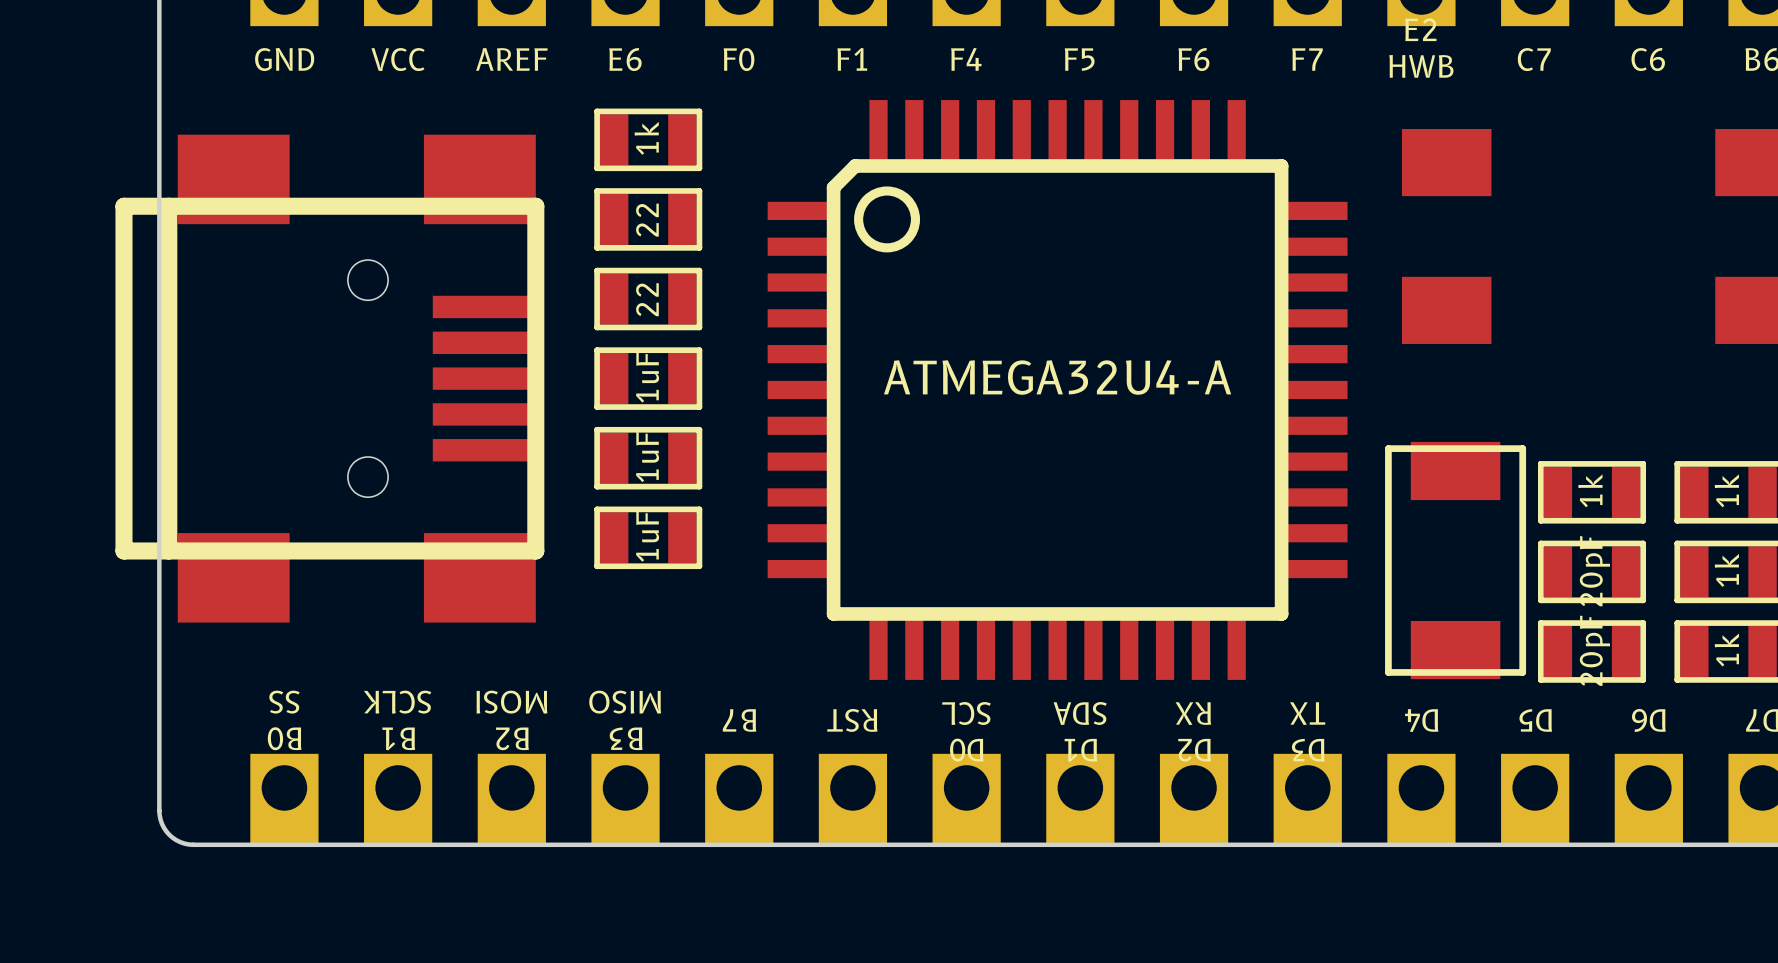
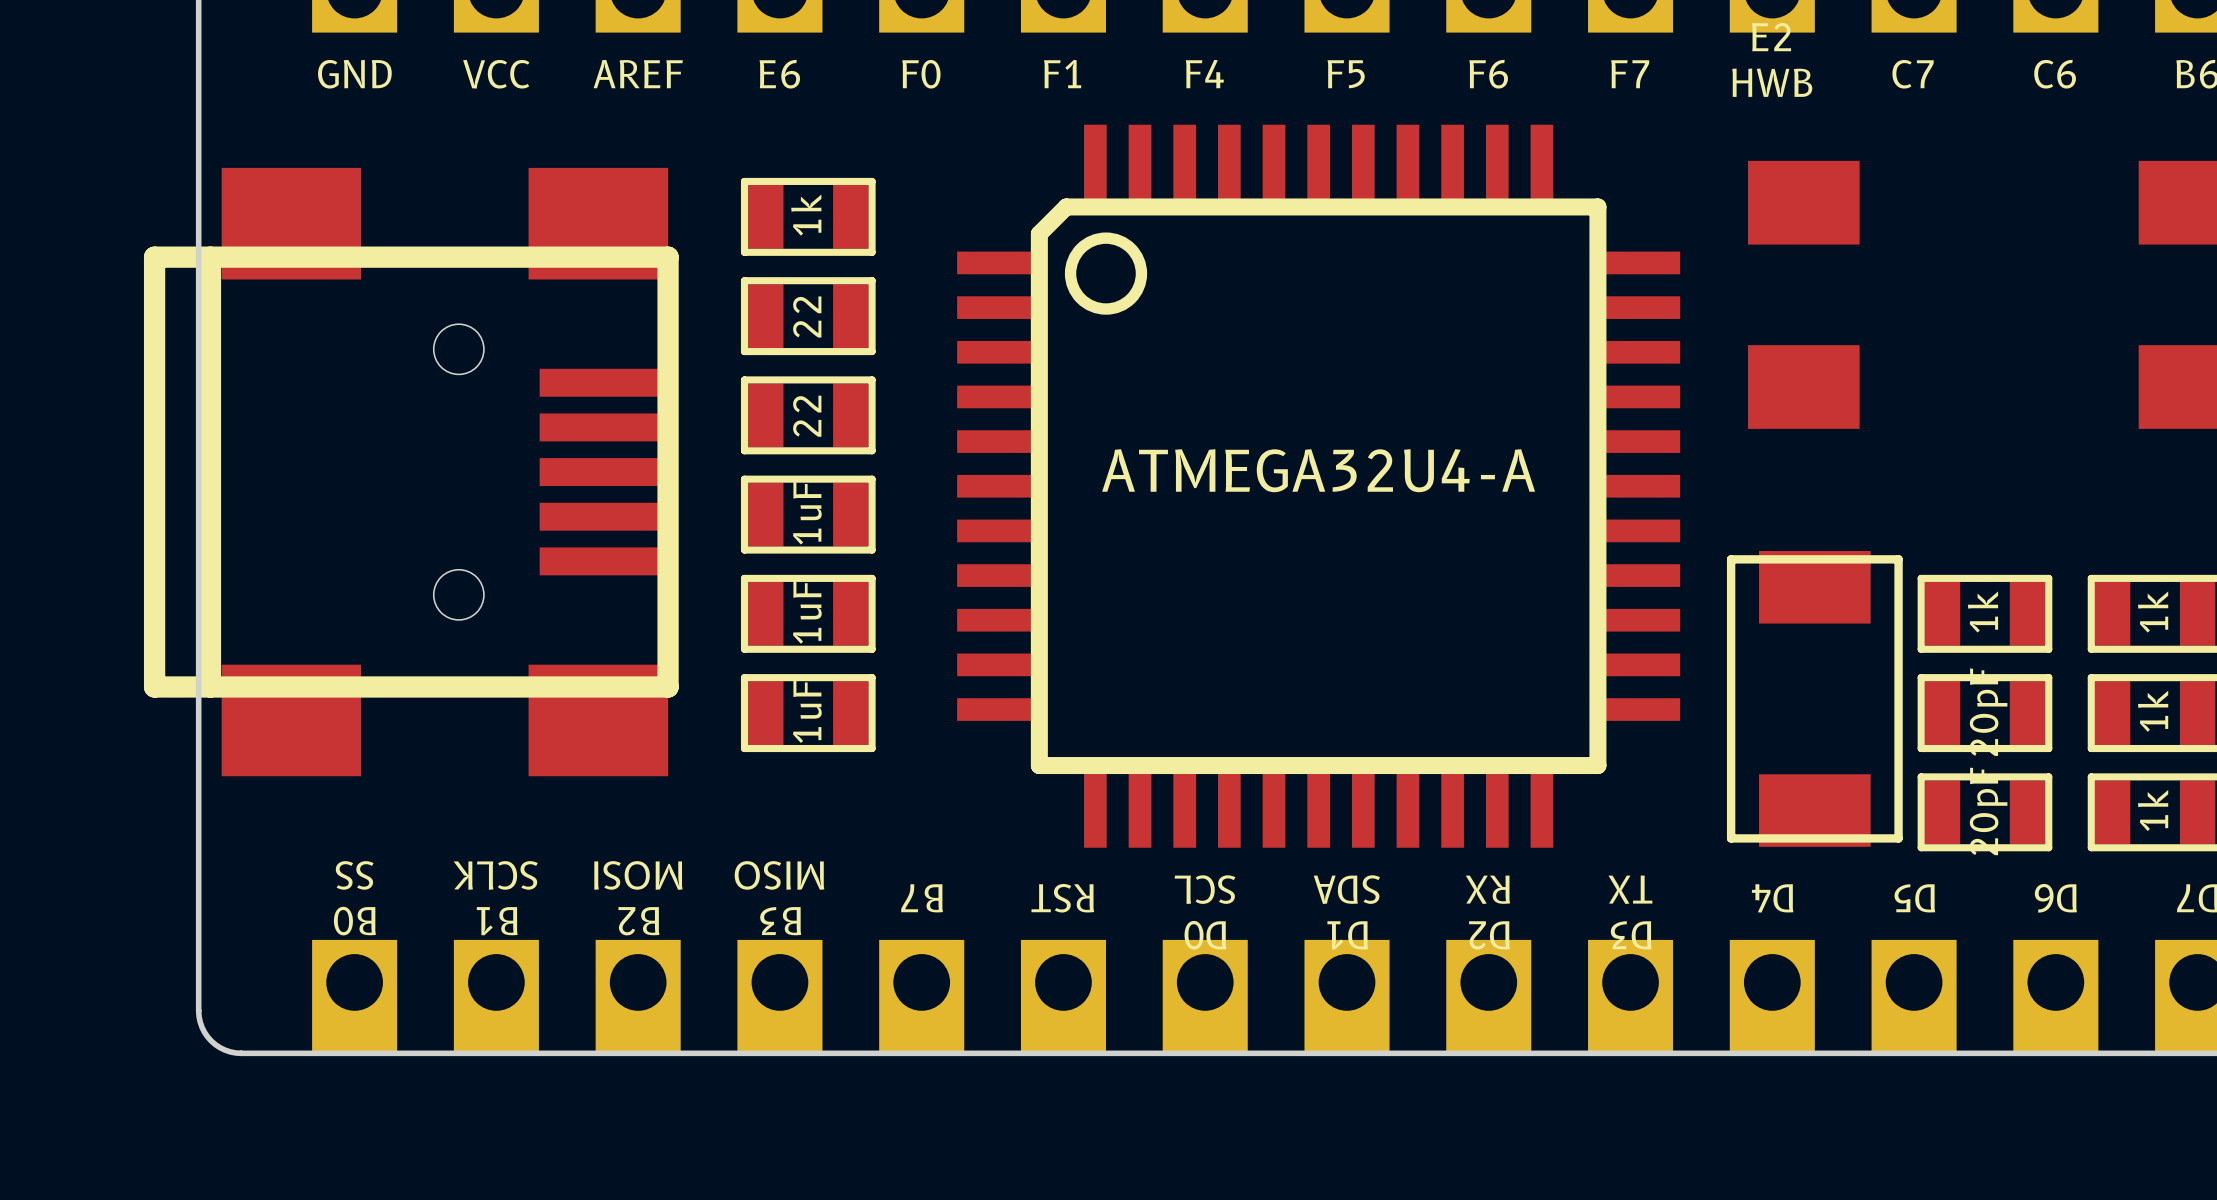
part position: (648, 139) -> (808, 216)
part: 22 (648, 219) -> none
part: none -> 22 (808, 316)
part: 22 (648, 299) -> none
part: none -> 22 (808, 415)
part: 1uF (648, 378) -> none
part: none -> 1uF (808, 514)
part: 1uF (648, 458) -> none
part: none -> 1uF (808, 613)
part: 1uF (648, 537) -> none
part: none -> 1uF (808, 713)

